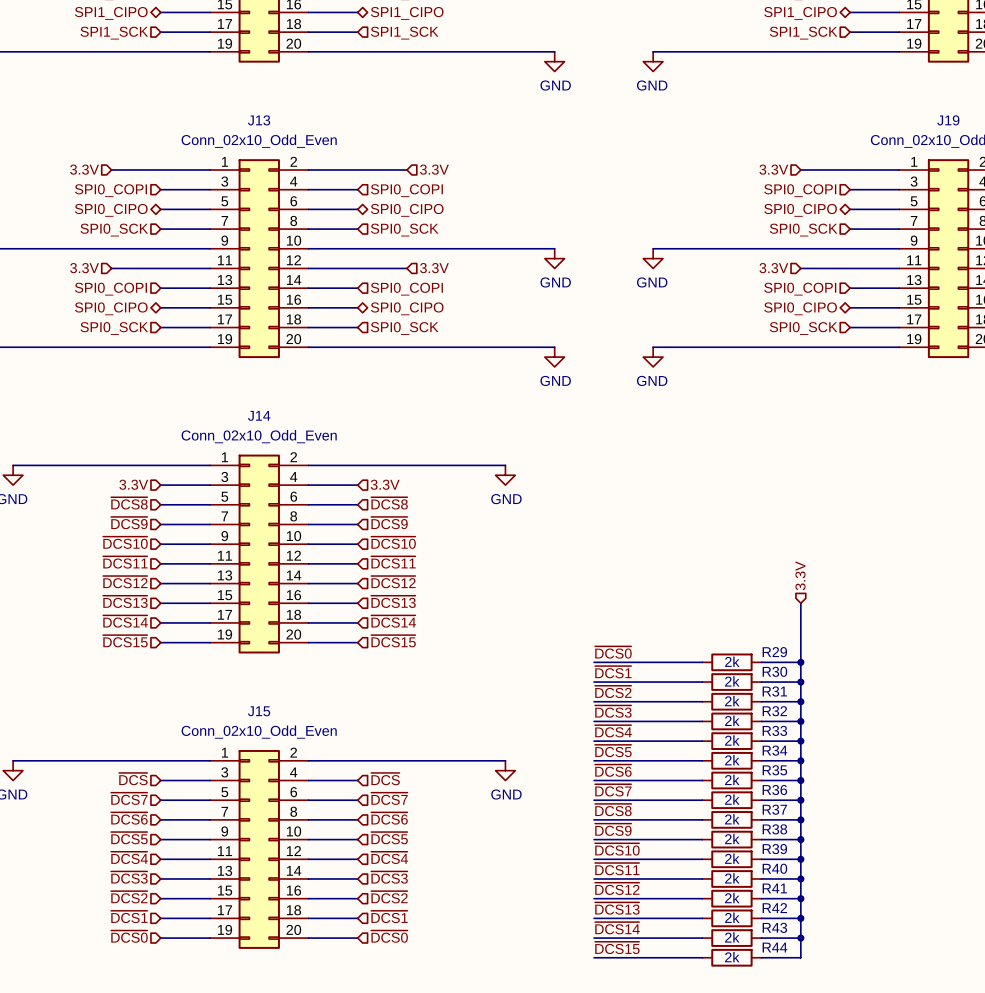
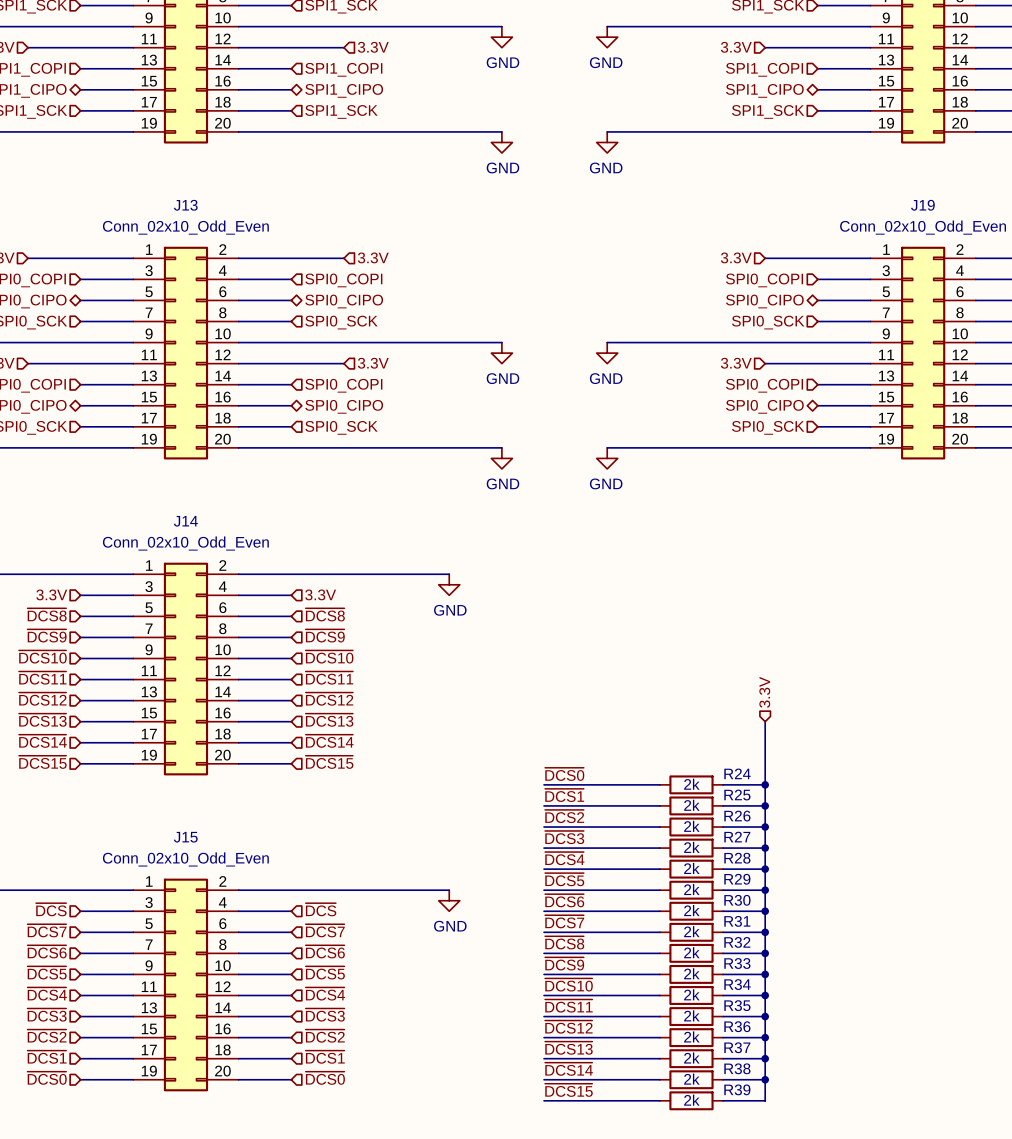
R29 name: R29 (774, 652) -> R24 (737, 773)
R30 name: R30 (774, 671) -> R25 (737, 795)
R31 name: R31 (774, 691) -> R26 (737, 816)
R32 name: R32 (774, 711) -> R27 (737, 837)
R33 name: R33 (774, 730) -> R28 (737, 858)
R34 name: R34 (774, 750) -> R29 (737, 879)
R35 name: R35 (774, 770) -> R30 (737, 900)
R36 name: R36 (774, 789) -> R31 (737, 921)
R37 name: R37 (774, 809) -> R32 (737, 942)
R38 name: R38 (774, 829) -> R33 (737, 963)
R39 name: R39 (774, 849) -> R34 (737, 984)
R40 name: R40 (774, 868) -> R35 (737, 1005)
R41 name: R41 (774, 888) -> R36 (737, 1026)
R42 name: R42 (774, 908) -> R37 (737, 1047)
R43 name: R43 (774, 927) -> R38 (737, 1068)
R44 name: R44 (774, 947) -> R39 (737, 1089)

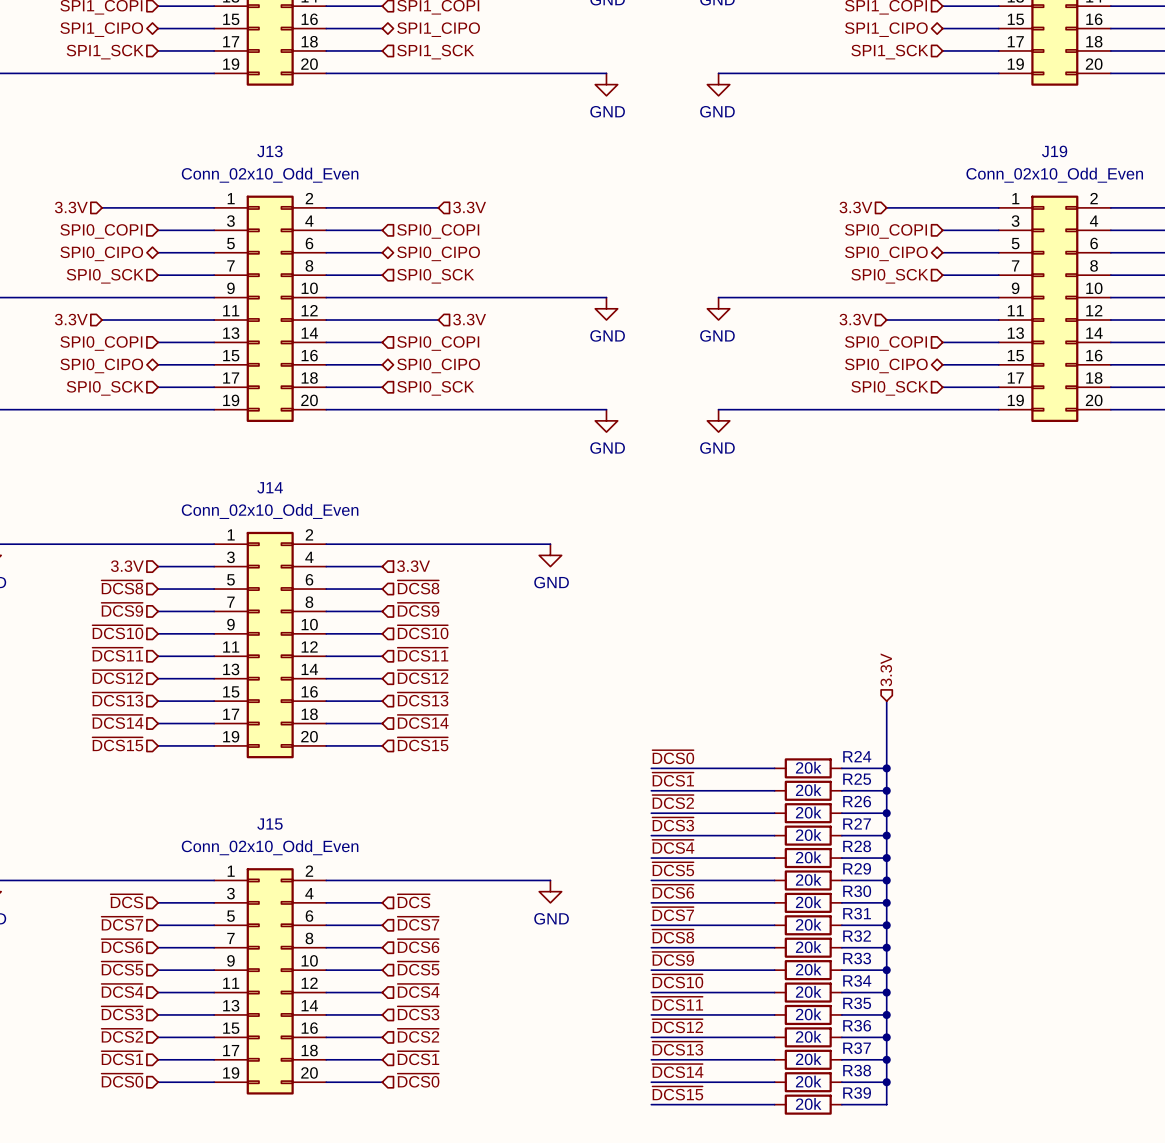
R24 value: 2k (691, 784) -> 20k (808, 767)
R25 value: 2k (691, 805) -> 20k (808, 790)
R26 value: 2k (691, 826) -> 20k (808, 812)
R27 value: 2k (691, 847) -> 20k (808, 834)
R28 value: 2k (691, 868) -> 20k (808, 857)
R29 value: 2k (691, 889) -> 20k (808, 879)
R30 value: 2k (691, 910) -> 20k (808, 902)
R31 value: 2k (691, 931) -> 20k (808, 924)
R32 value: 2k (691, 952) -> 20k (808, 947)
R33 value: 2k (691, 973) -> 20k (808, 969)
R34 value: 2k (691, 994) -> 20k (808, 991)
R35 value: 2k (691, 1015) -> 20k (808, 1014)
R36 value: 2k (691, 1036) -> 20k (808, 1036)
R37 value: 2k (691, 1058) -> 20k (808, 1059)
R38 value: 2k (691, 1079) -> 20k (808, 1081)
R39 value: 2k (691, 1100) -> 20k (808, 1104)

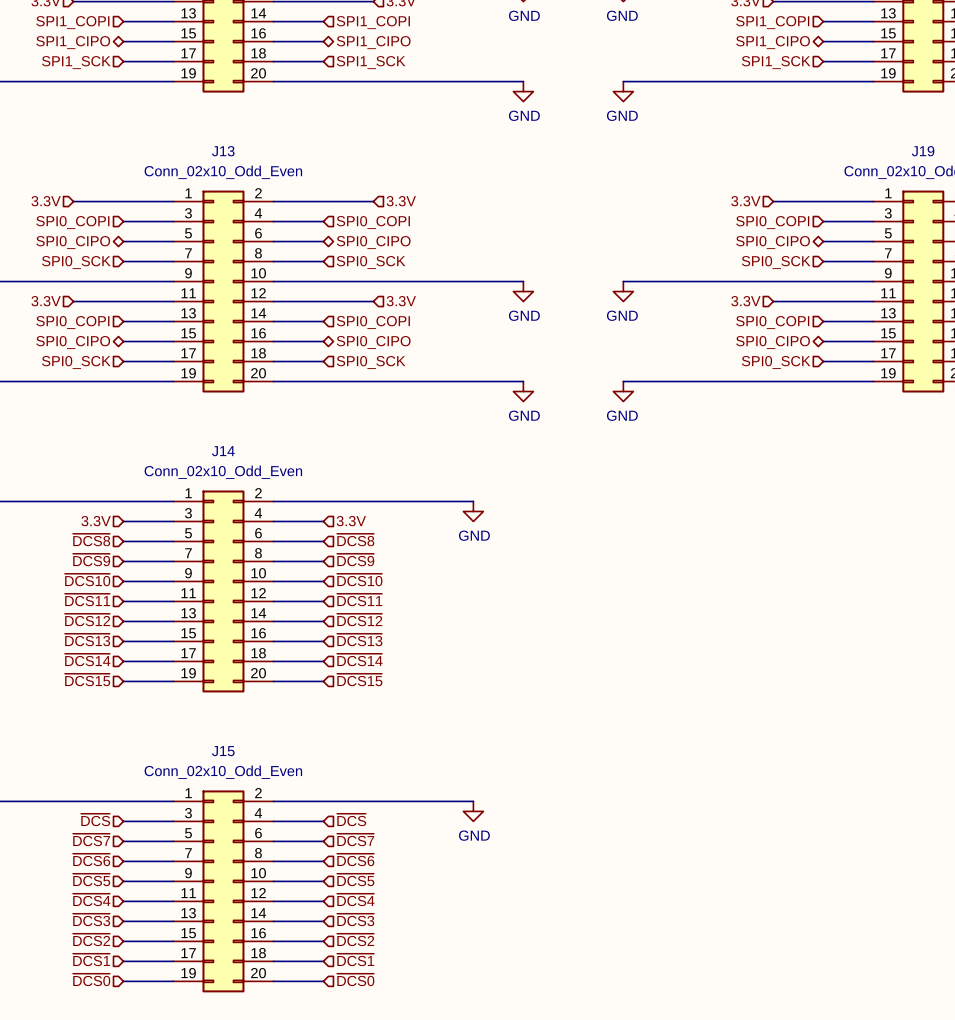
hierarchical label: 3.3V (886, 669) -> none
wire: (886, 701) (886, 1104) (841, 1104) -> none
label: ~{DCS0} (673, 757) -> none
wire: (651, 768) (774, 768) -> none
R24: 20k (808, 768) -> none
wire: (841, 768) (886, 768) -> none
junction: (886, 768) -> none
label: ~{DCS1} (673, 779) -> none
wire: (651, 790) (774, 790) -> none
R25: 20k (808, 790) -> none
wire: (841, 790) (886, 790) -> none
junction: (886, 790) -> none
label: ~{DCS2} (673, 801) -> none
wire: (651, 813) (774, 813) -> none
R26: 20k (808, 813) -> none
wire: (841, 813) (886, 813) -> none
junction: (886, 813) -> none
label: ~{DCS3} (673, 824) -> none
wire: (651, 835) (774, 835) -> none
R27: 20k (808, 835) -> none
wire: (841, 835) (886, 835) -> none
junction: (886, 835) -> none
label: ~{DCS4} (673, 846) -> none
wire: (651, 858) (774, 858) -> none
R28: 20k (808, 858) -> none
wire: (841, 858) (886, 858) -> none
junction: (886, 858) -> none
label: ~{DCS5} (673, 869) -> none
wire: (651, 880) (774, 880) -> none
R29: 20k (808, 880) -> none
wire: (841, 880) (886, 880) -> none
junction: (886, 880) -> none
label: ~{DCS6} (673, 891) -> none
wire: (651, 902) (774, 902) -> none
R30: 20k (808, 902) -> none
wire: (841, 902) (886, 902) -> none
junction: (886, 902) -> none
label: ~{DCS7} (673, 914) -> none
wire: (651, 925) (774, 925) -> none
R31: 20k (808, 925) -> none
wire: (841, 925) (886, 925) -> none
junction: (886, 925) -> none
label: ~{DCS8} (673, 936) -> none
wire: (651, 947) (774, 947) -> none
R32: 20k (808, 947) -> none
wire: (841, 947) (886, 947) -> none
junction: (886, 947) -> none
label: ~{DCS9} (673, 958) -> none
wire: (651, 970) (774, 970) -> none
R33: 20k (808, 970) -> none
wire: (841, 970) (886, 970) -> none
junction: (886, 970) -> none
label: ~{DCS10} (677, 981) -> none
wire: (651, 992) (774, 992) -> none
R34: 20k (808, 992) -> none
wire: (841, 992) (886, 992) -> none
junction: (886, 992) -> none
label: ~{DCS11} (677, 1003) -> none
wire: (651, 1014) (774, 1014) -> none
R35: 20k (808, 1014) -> none
wire: (841, 1014) (886, 1014) -> none
junction: (886, 1014) -> none
label: ~{DCS12} (677, 1026) -> none
wire: (651, 1037) (774, 1037) -> none
R36: 20k (808, 1037) -> none
wire: (841, 1037) (886, 1037) -> none
junction: (886, 1037) -> none
label: ~{DCS13} (677, 1048) -> none
wire: (651, 1059) (774, 1059) -> none
R37: 20k (808, 1059) -> none
wire: (841, 1059) (886, 1059) -> none
junction: (886, 1059) -> none
label: ~{DCS14} (677, 1071) -> none
wire: (651, 1082) (774, 1082) -> none
R38: 20k (808, 1082) -> none
wire: (841, 1082) (886, 1082) -> none
junction: (886, 1082) -> none
label: ~{DCS15} (677, 1093) -> none
wire: (651, 1104) (774, 1104) -> none
R39: 20k (808, 1104) -> none

